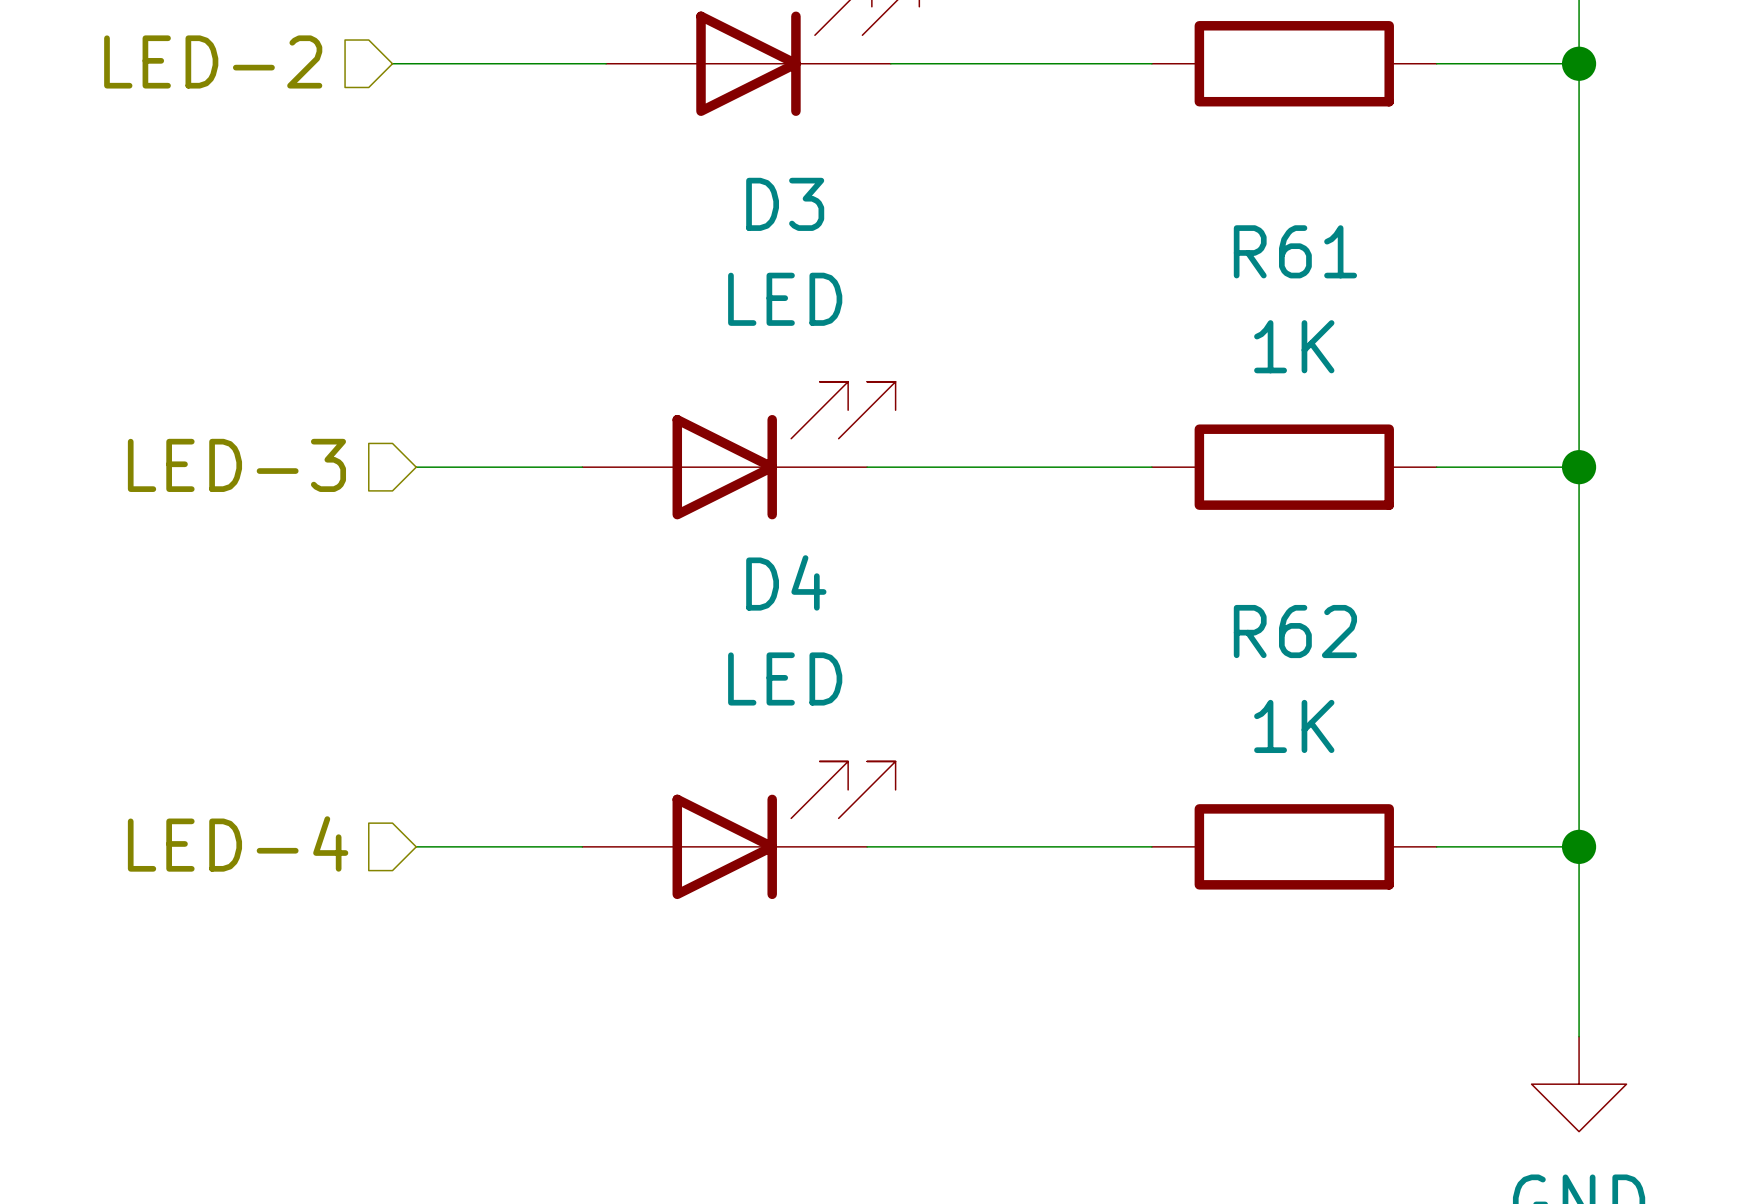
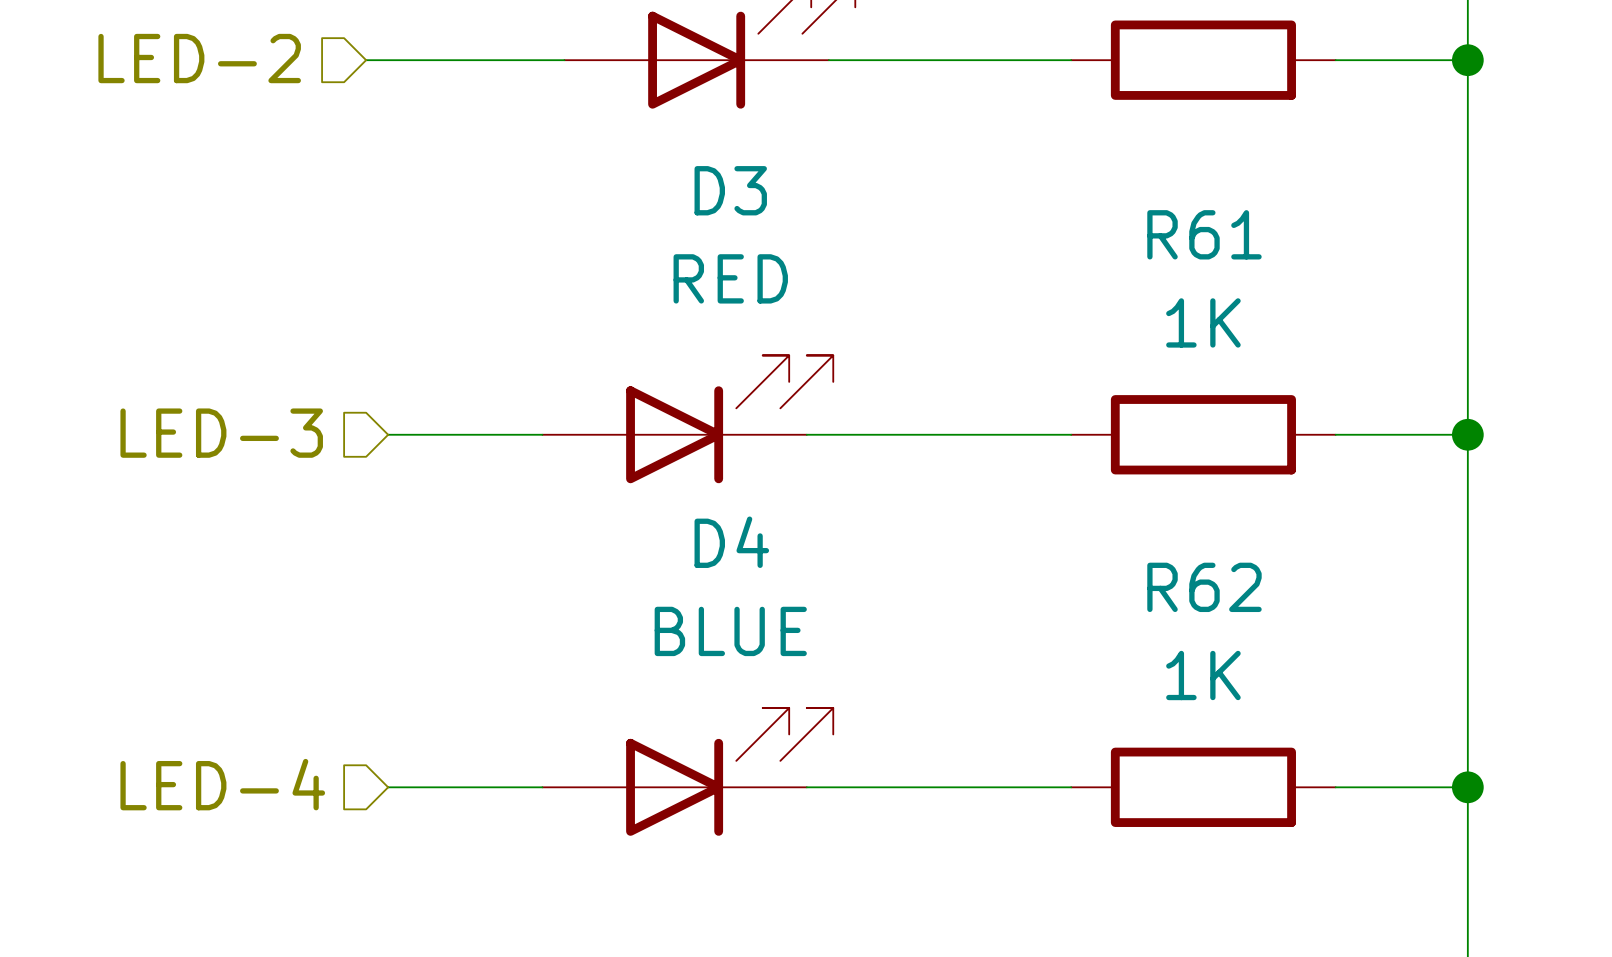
D3 value: LED (785, 299) -> RED (730, 278)
D4 value: LED (785, 678) -> BLUE (730, 631)

